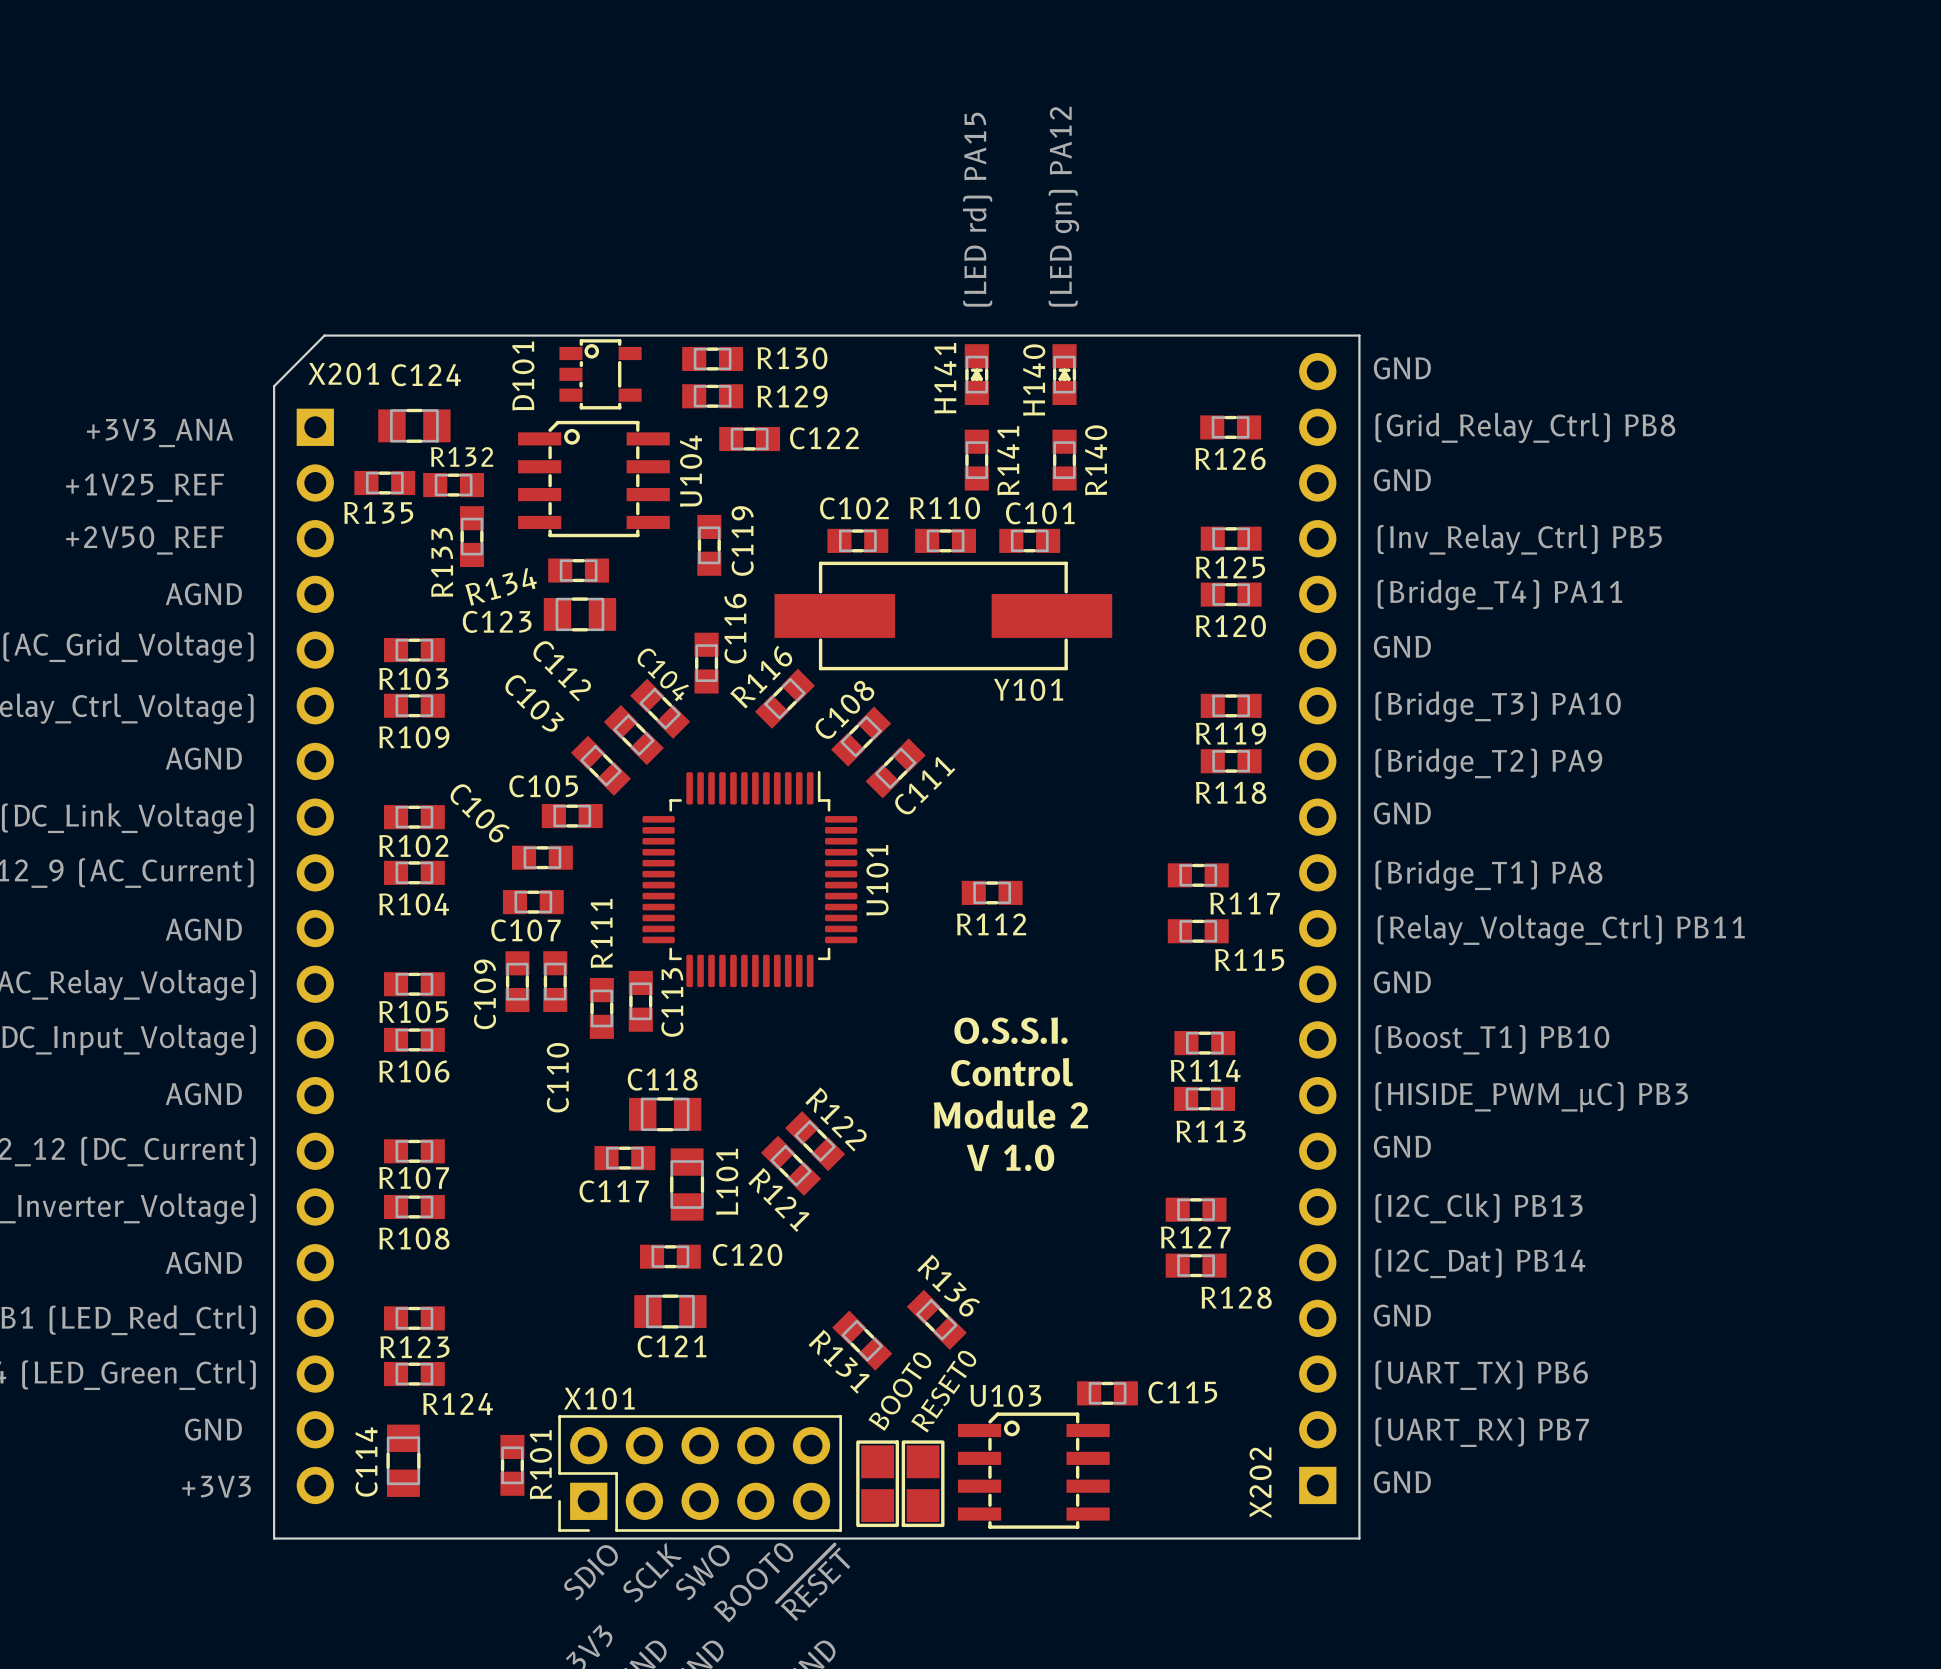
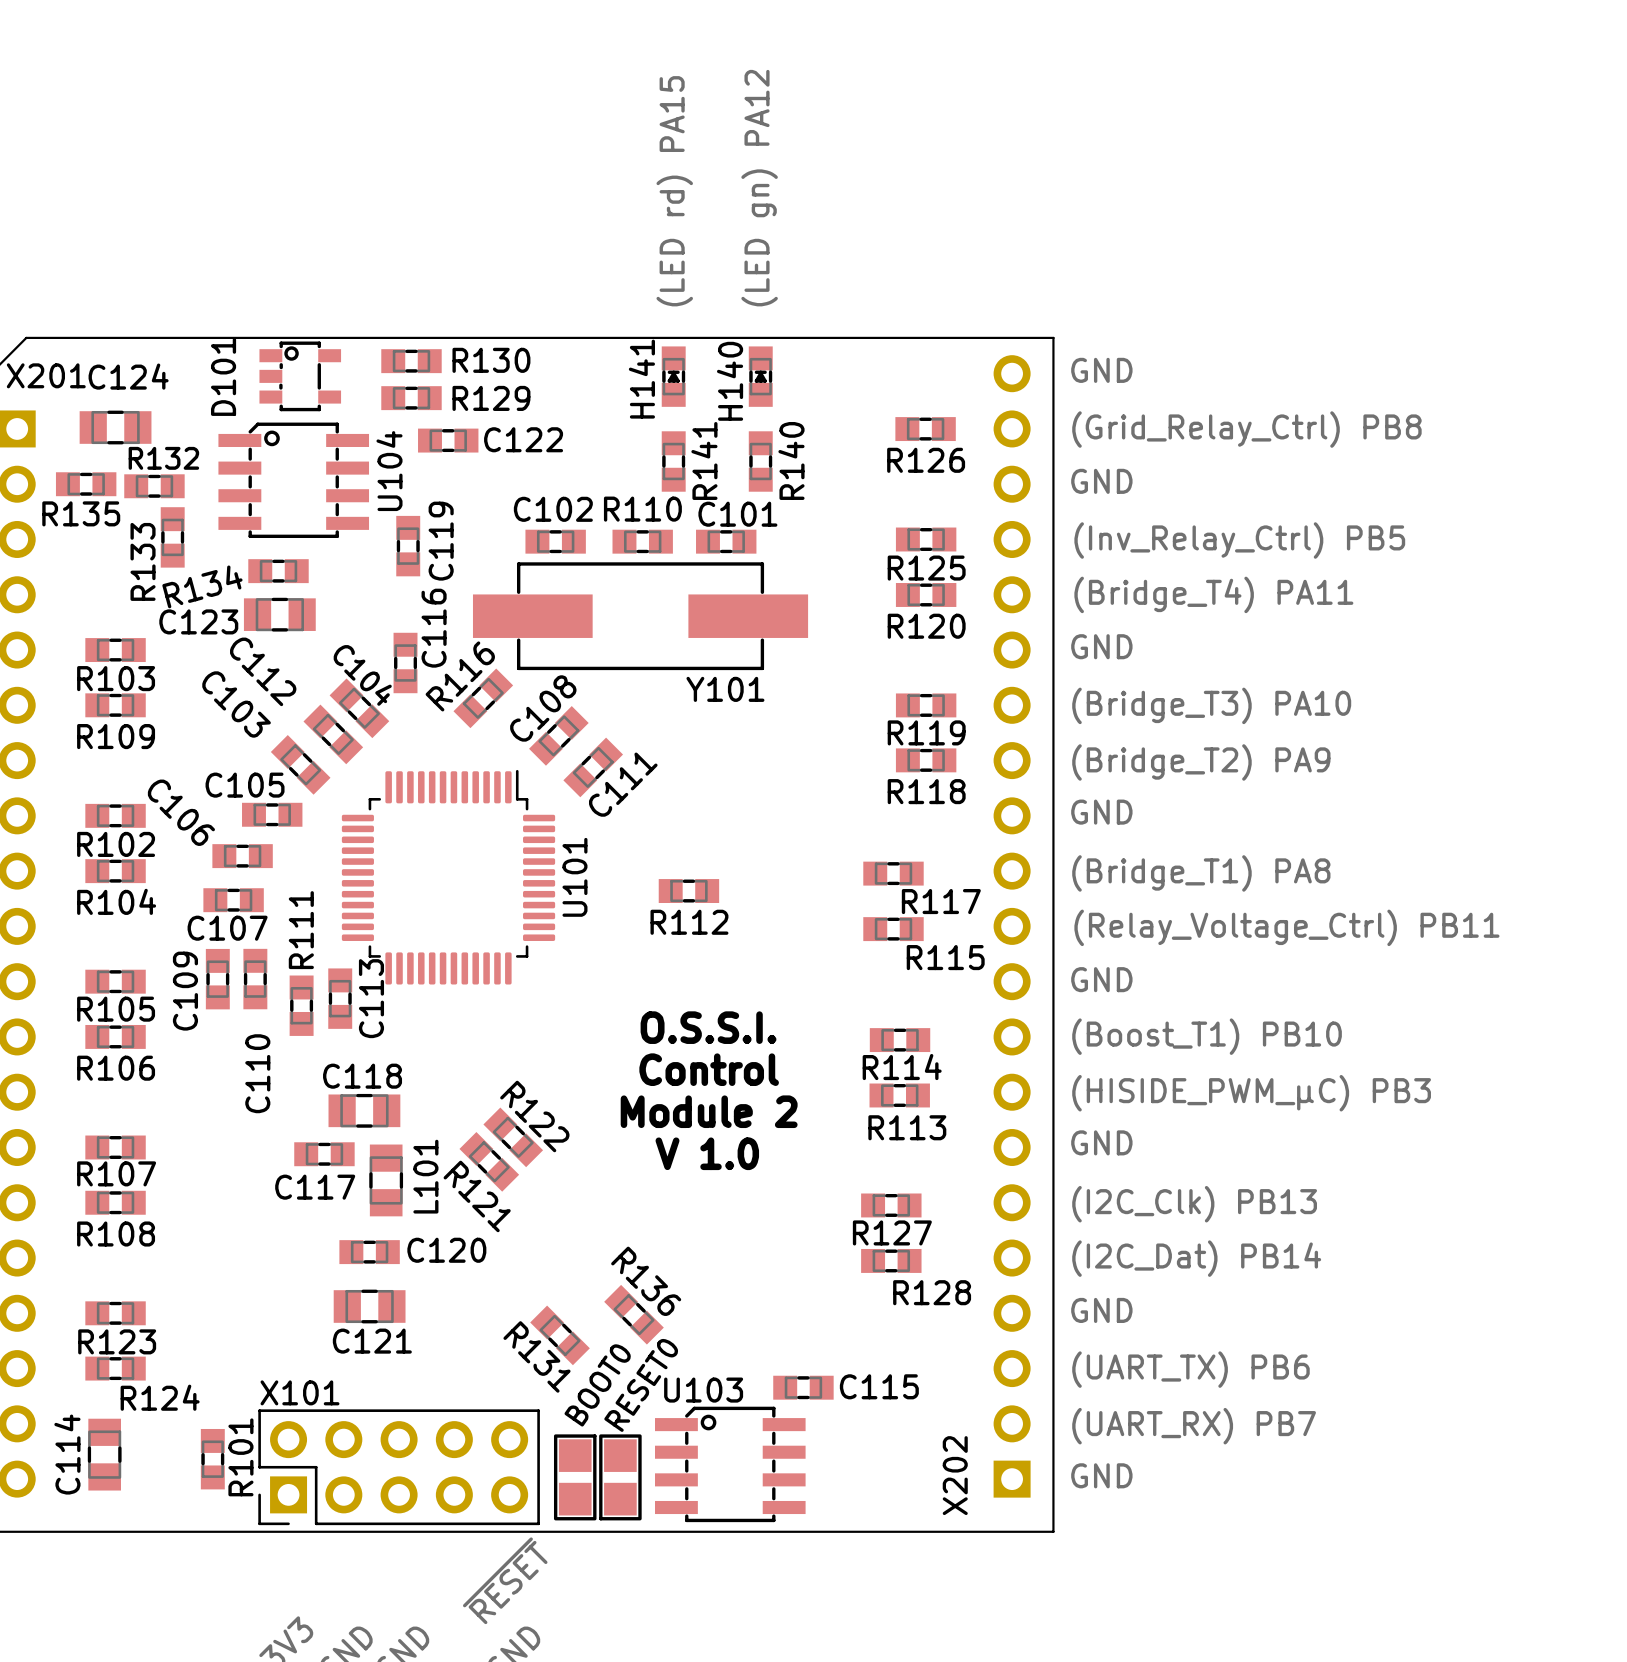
text: SDIO (591, 1572) -> none
text: SCLK (652, 1572) -> none
text: SWO (702, 1572) -> none
text: BOOT0 (753, 1582) -> none

